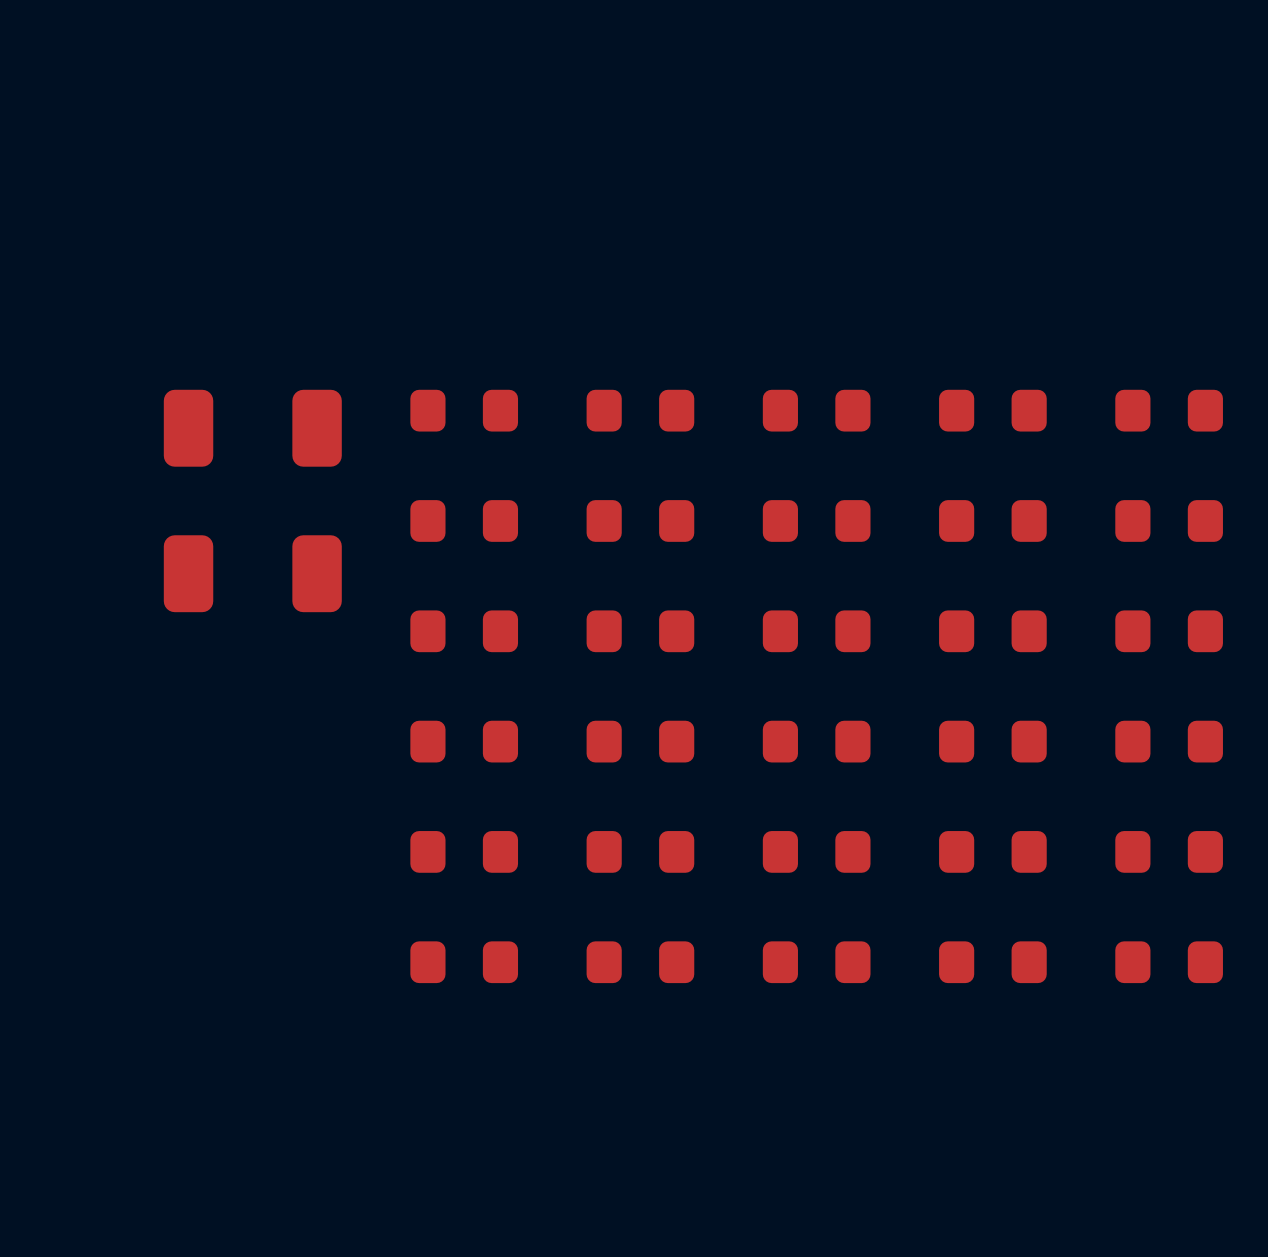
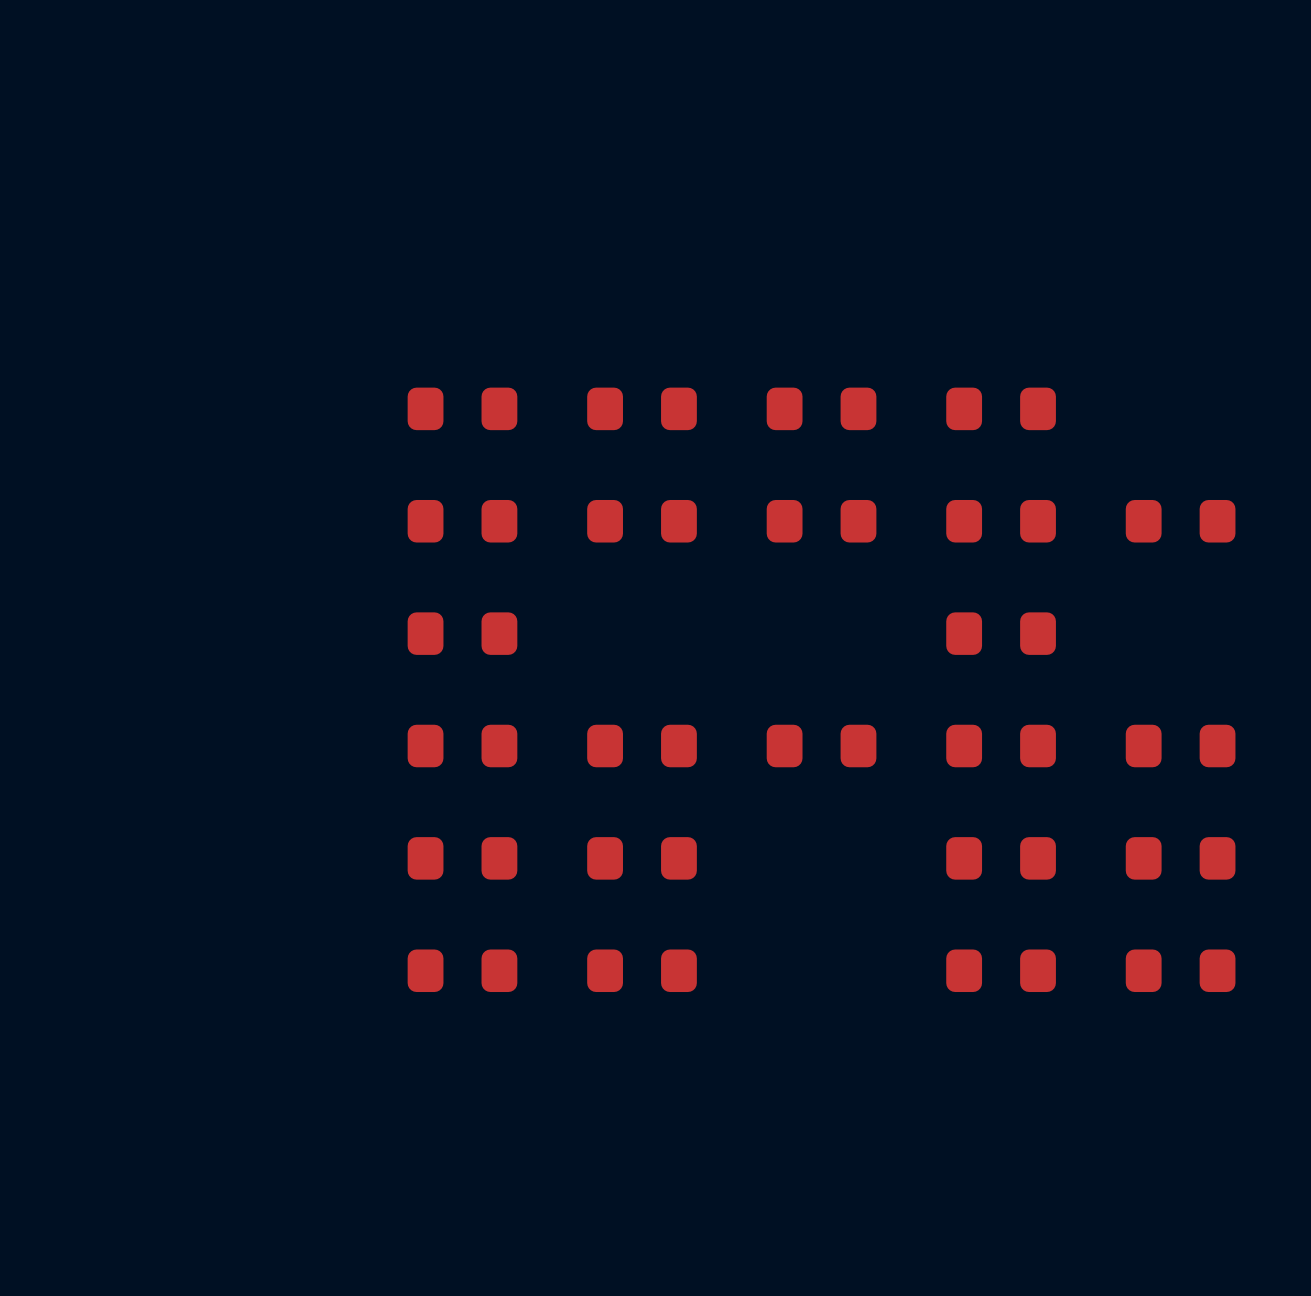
part: (1169, 410) -> none
part: (252, 428) -> none
part: (252, 573) -> none
part: (640, 631) -> none
part: (816, 631) -> none
part: (1169, 631) -> none
part: (816, 851) -> none
part: (816, 962) -> none

